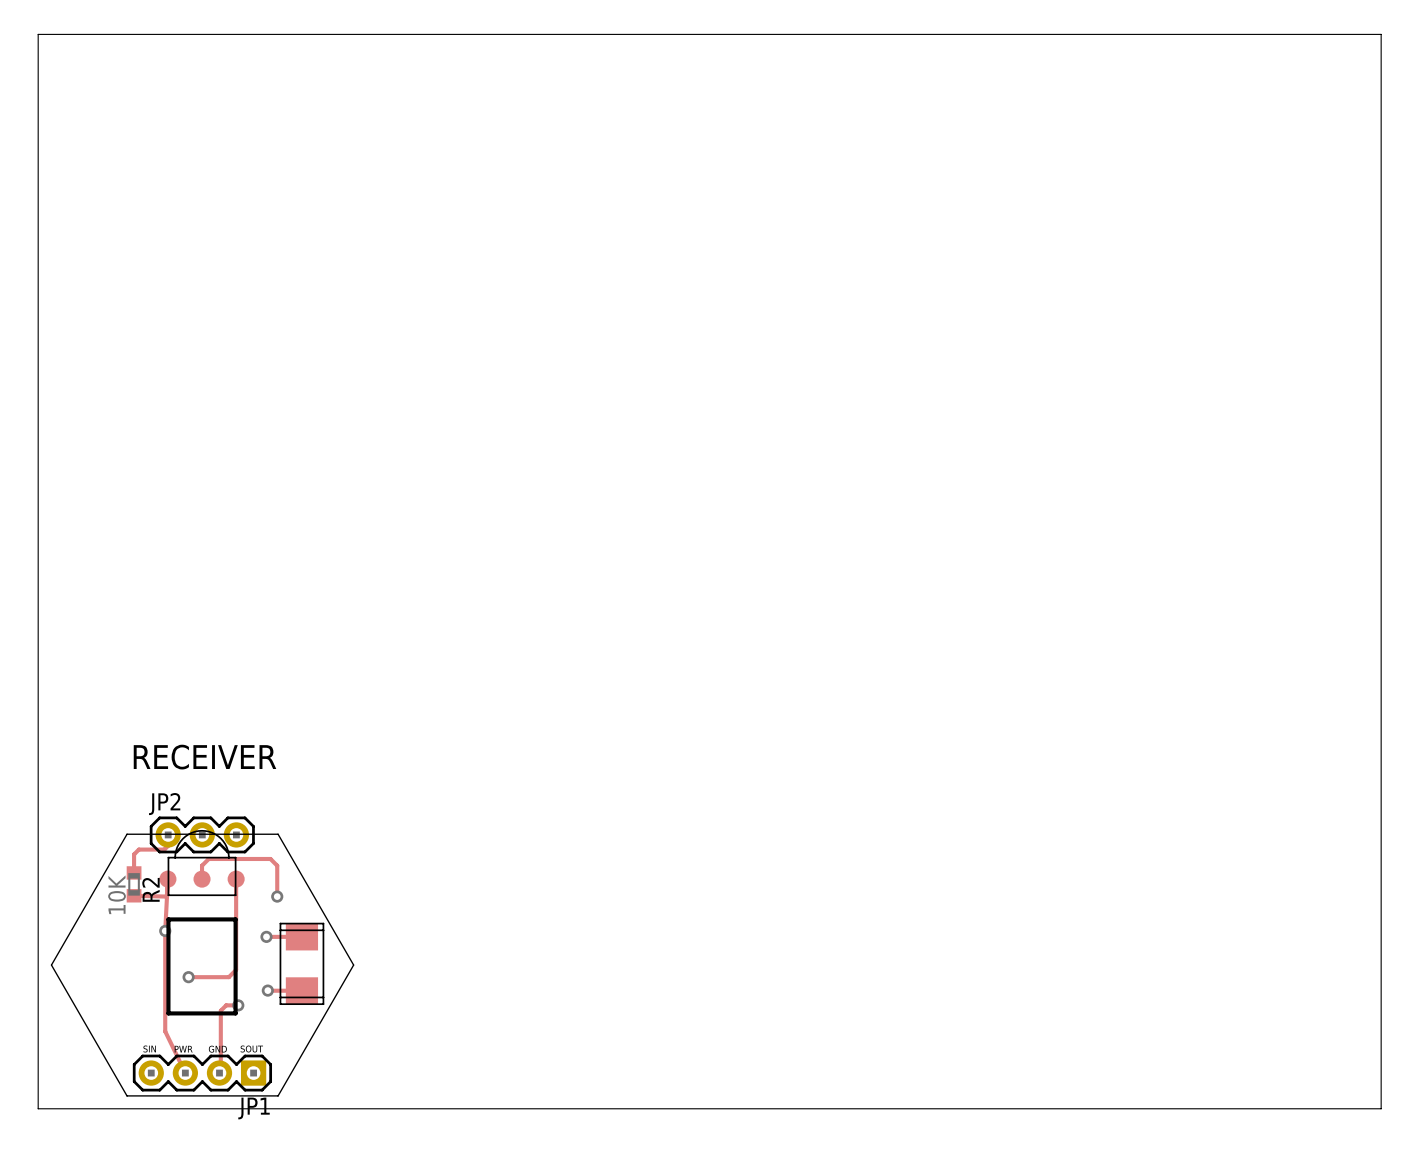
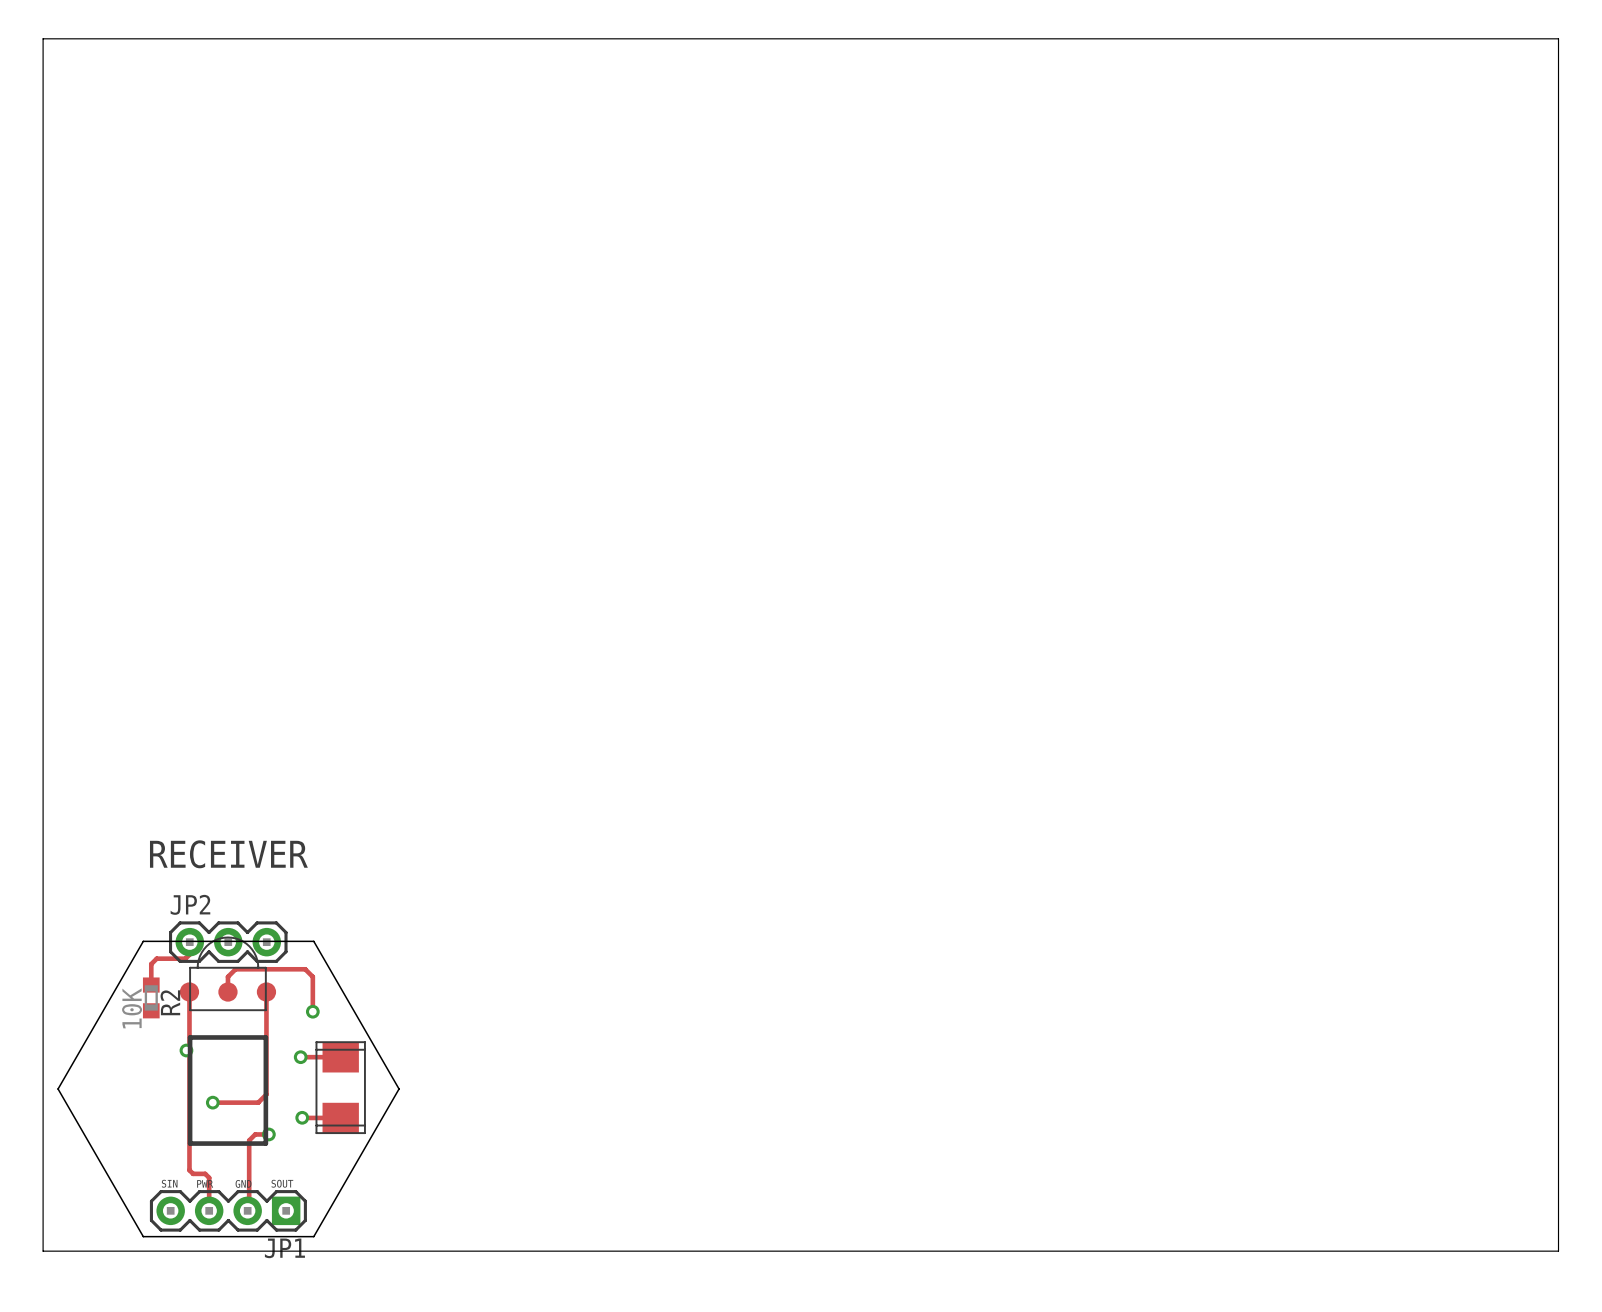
track: (134, 895) (166, 896) (167, 879) (165, 930) (165, 1031) (185, 1073) -> (189, 992) (189, 1170) (193, 1173) (205, 1173) (209, 1177) (209, 1210)

